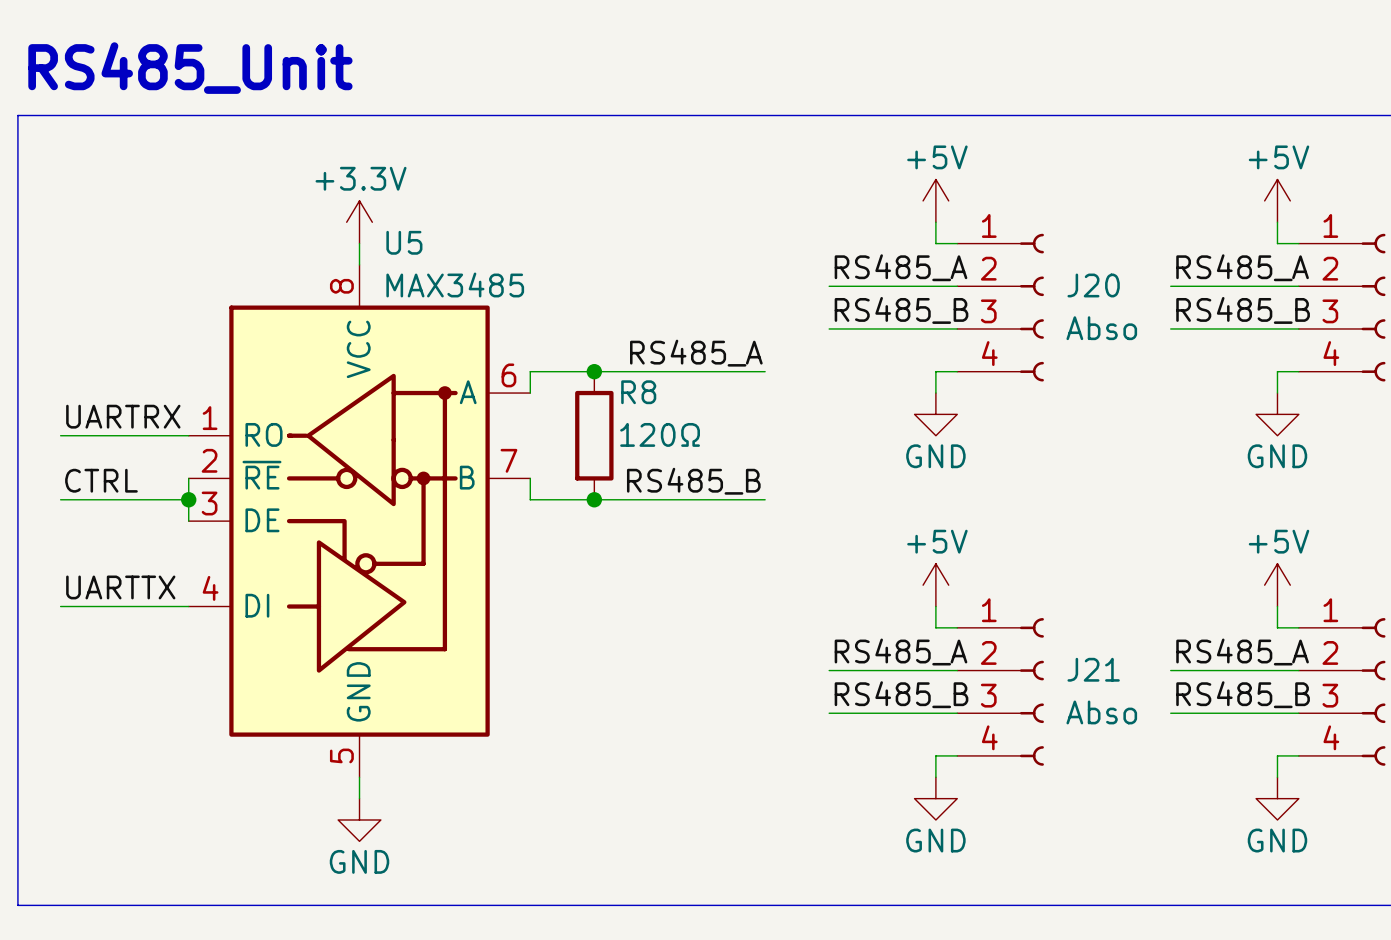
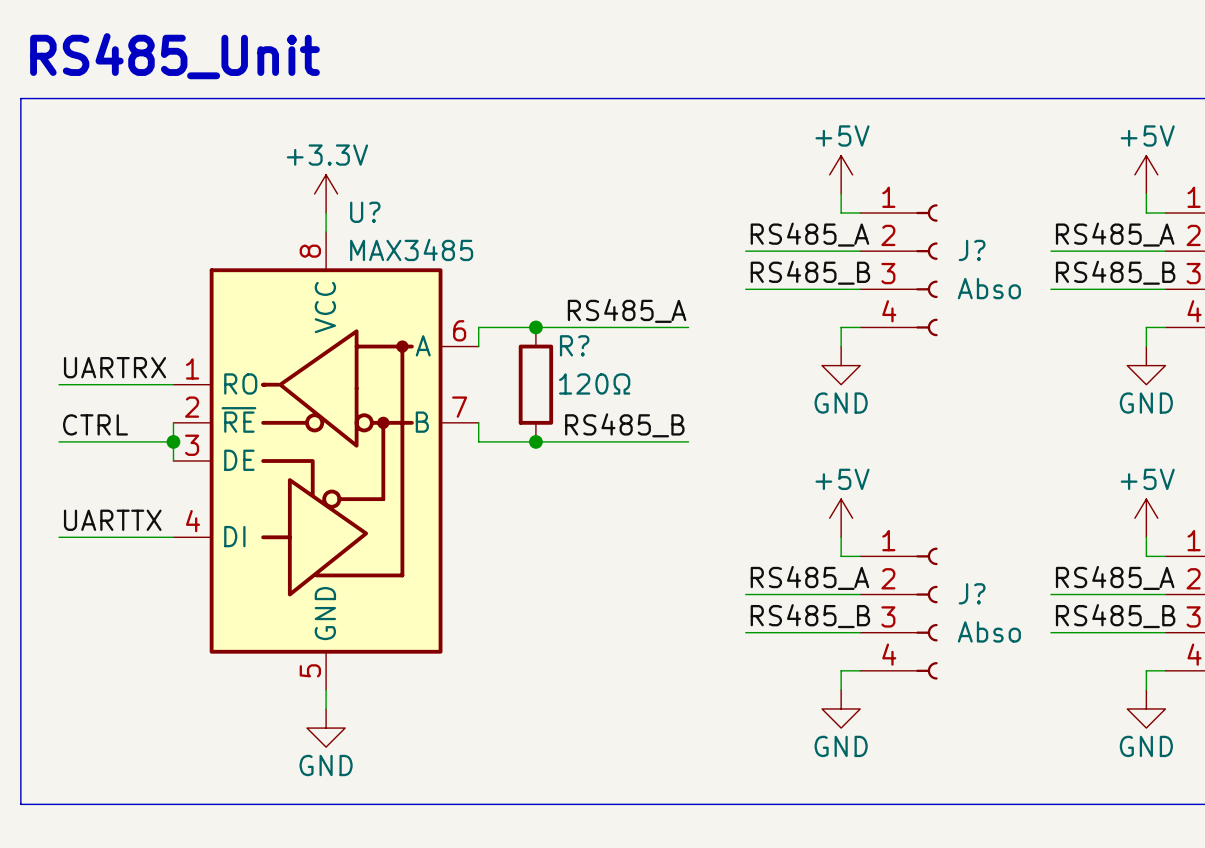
U5 name: U5 (404, 242) -> U? (365, 212)
J20 name: J20 (1093, 285) -> J? (972, 250)
R8 name: R8 (638, 392) -> R? (574, 345)
J21 name: J21 (1093, 669) -> J? (972, 593)

